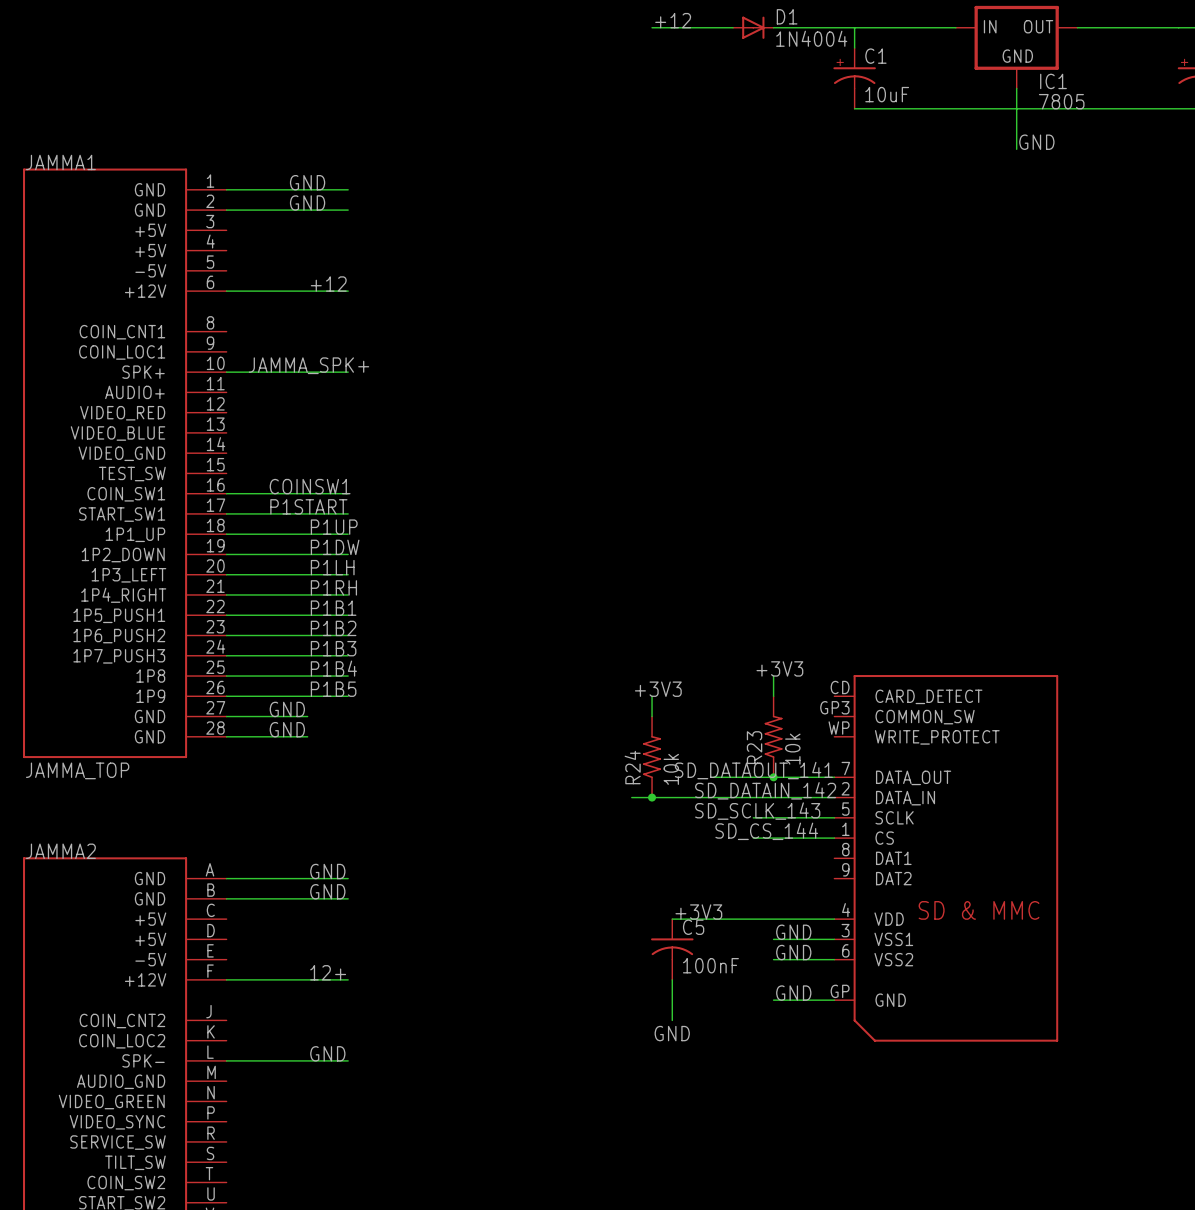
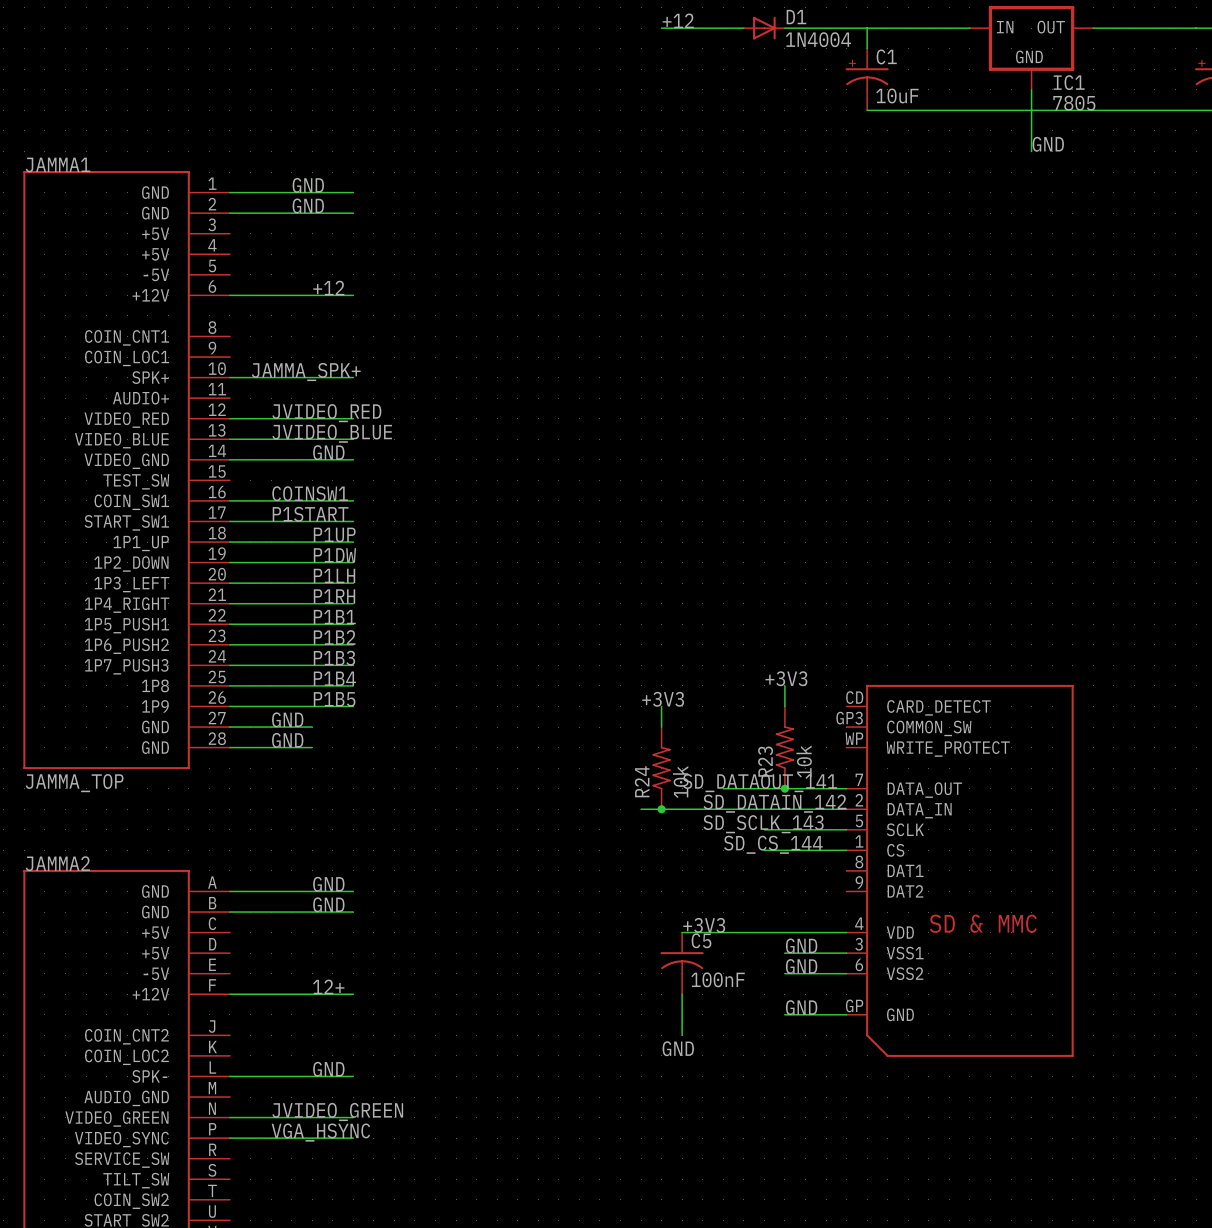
label: none -> JVIDEO_RED (326, 413)
wire: none -> (229, 418) (353, 418)
label: none -> JVIDEO_BLUE (332, 433)
wire: none -> (229, 439) (353, 439)
label: none -> GND (328, 452)
wire: none -> (229, 459) (353, 459)
label: none -> JVIDEO_GREEN (337, 1112)
wire: none -> (229, 1117) (353, 1117)
label: none -> VGA_HSYNC (320, 1132)
wire: none -> (229, 1138) (353, 1138)

